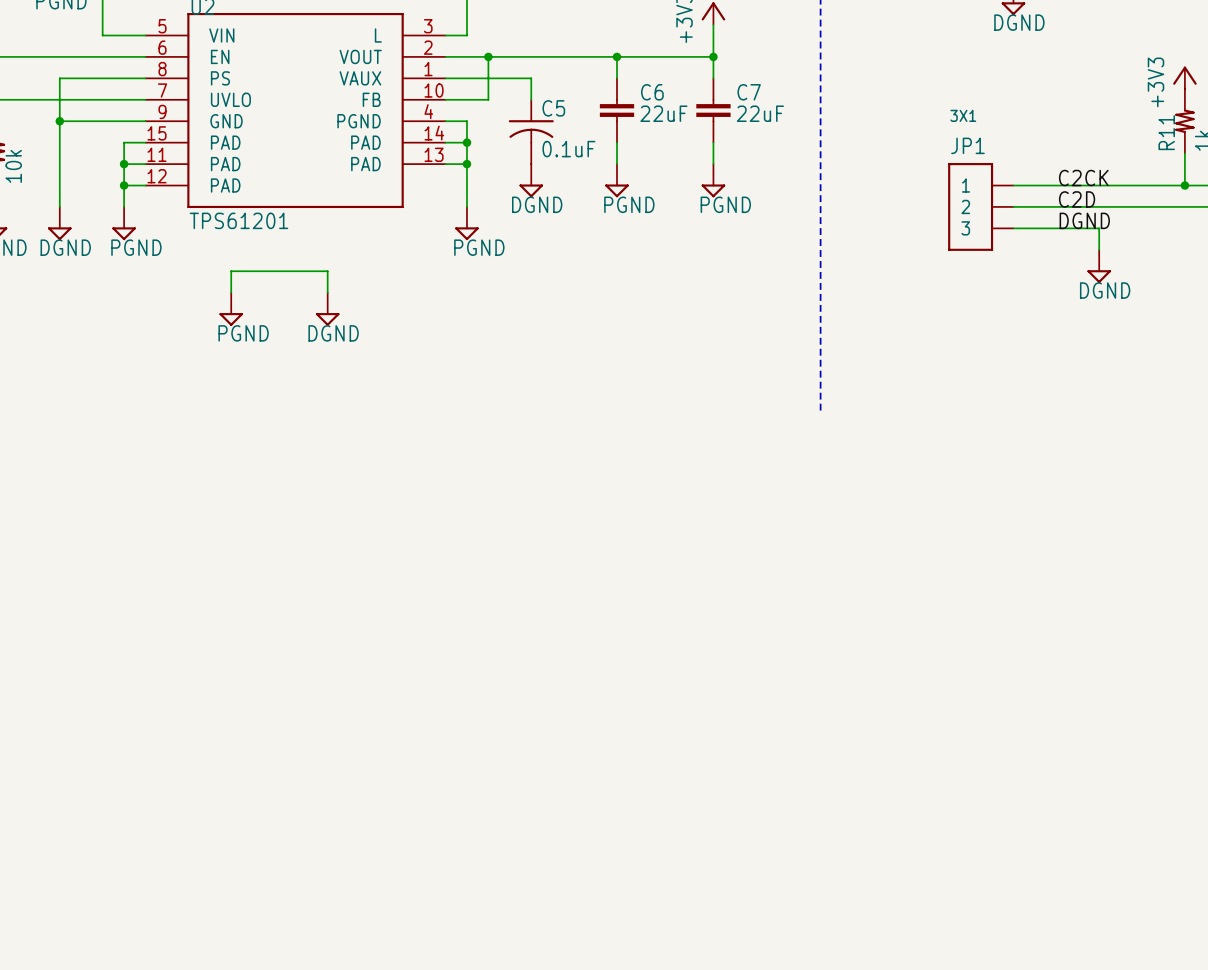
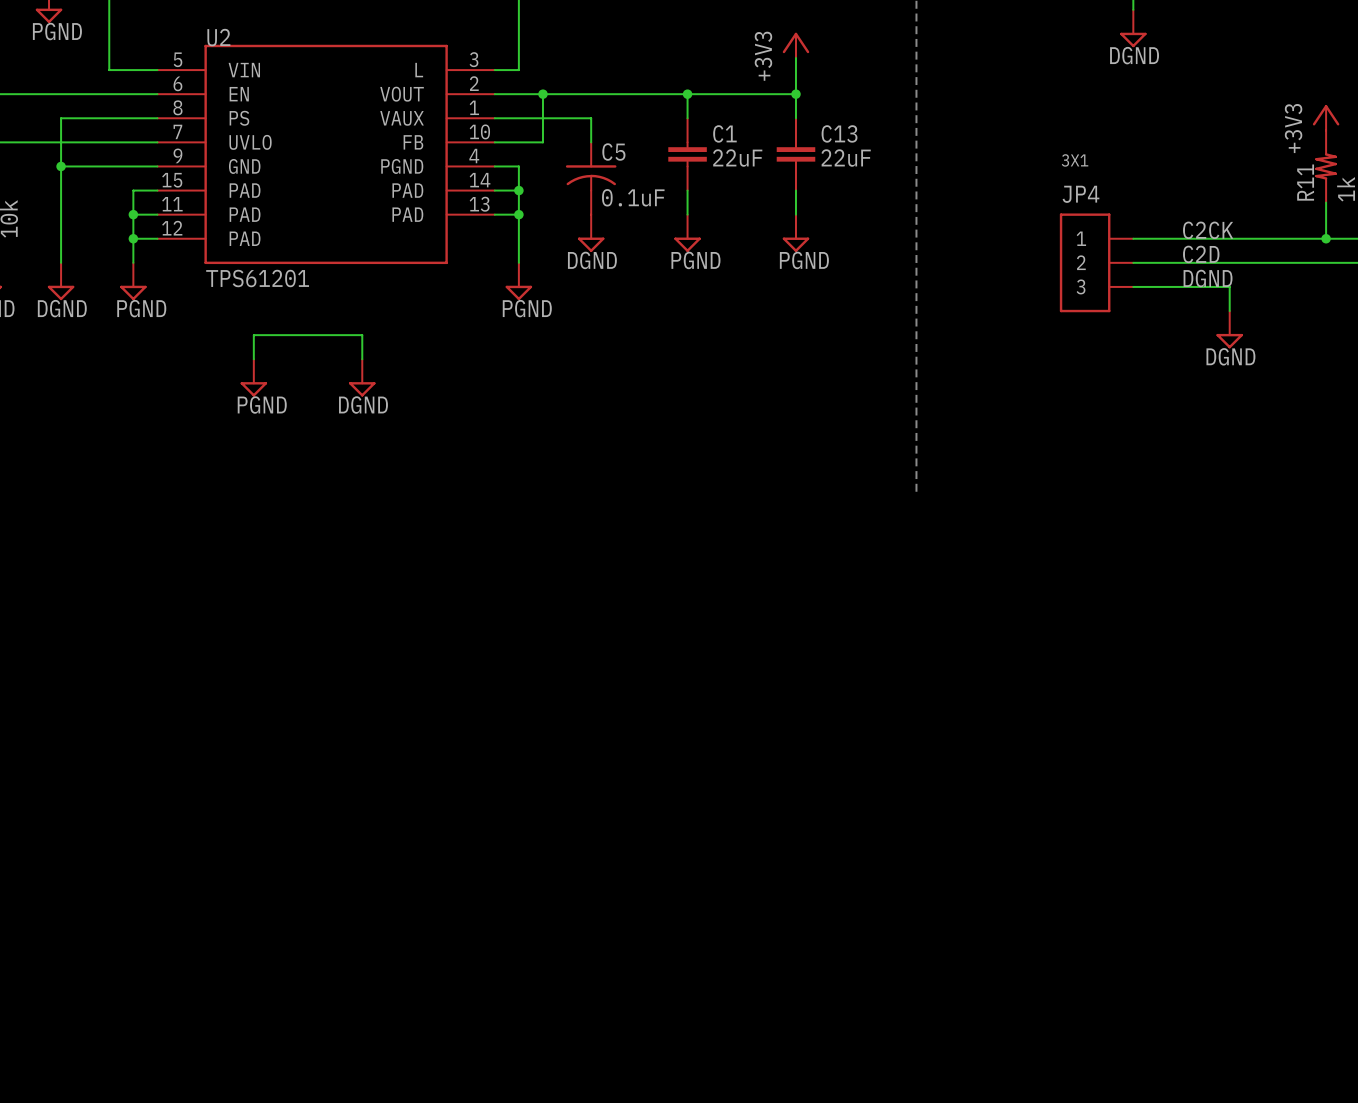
C6 name: C6 (652, 92) -> C1 (724, 133)
C7 name: C7 (749, 92) -> C13 (839, 133)
JP1 name: JP1 (967, 145) -> JP4 (1081, 194)

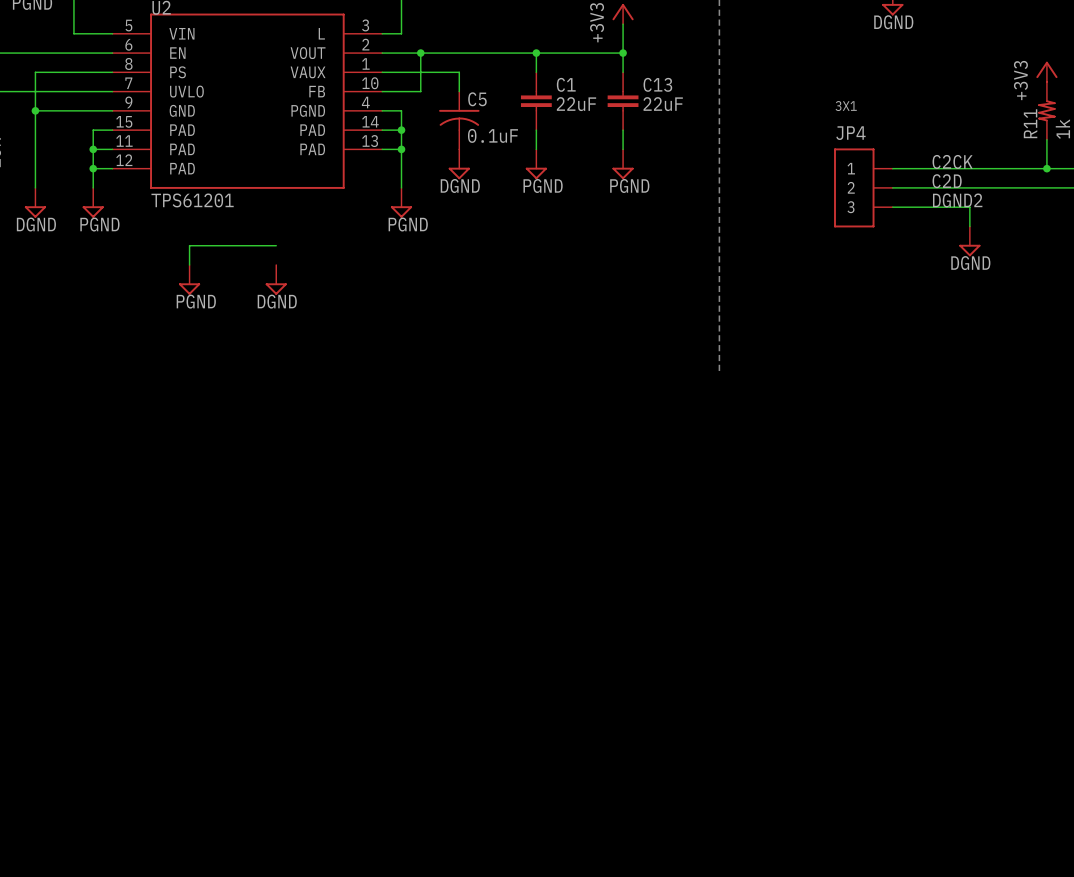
label: DGND (1208, 278) -> DGND2 (957, 200)
wire: (362, 335) (362, 359) -> none

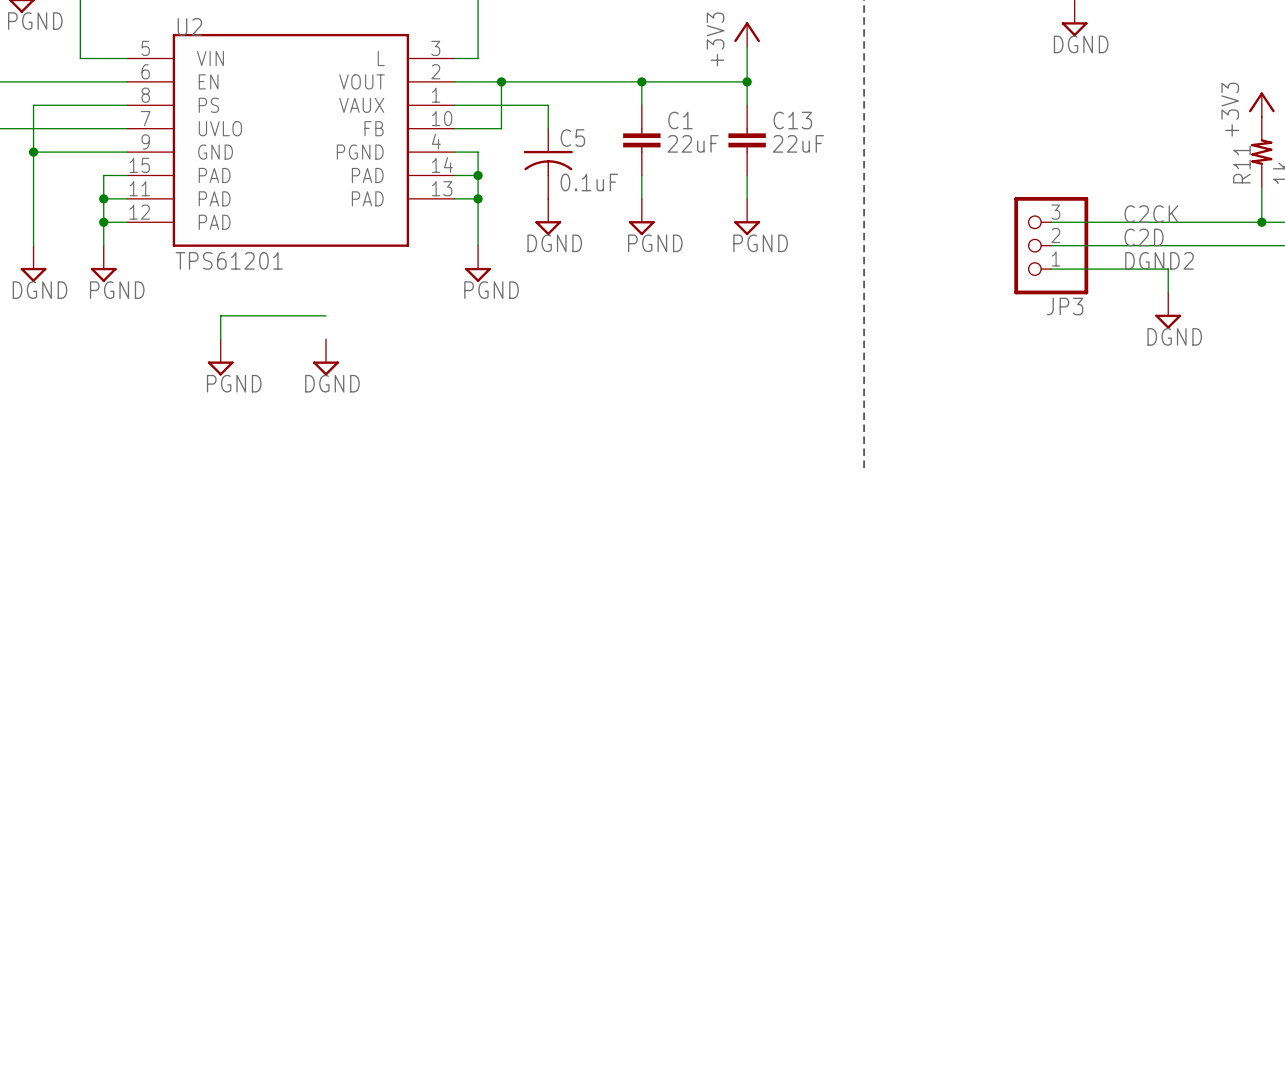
JP4: 3X1 (863, 187) -> none
JP3: none -> (1051, 245)

